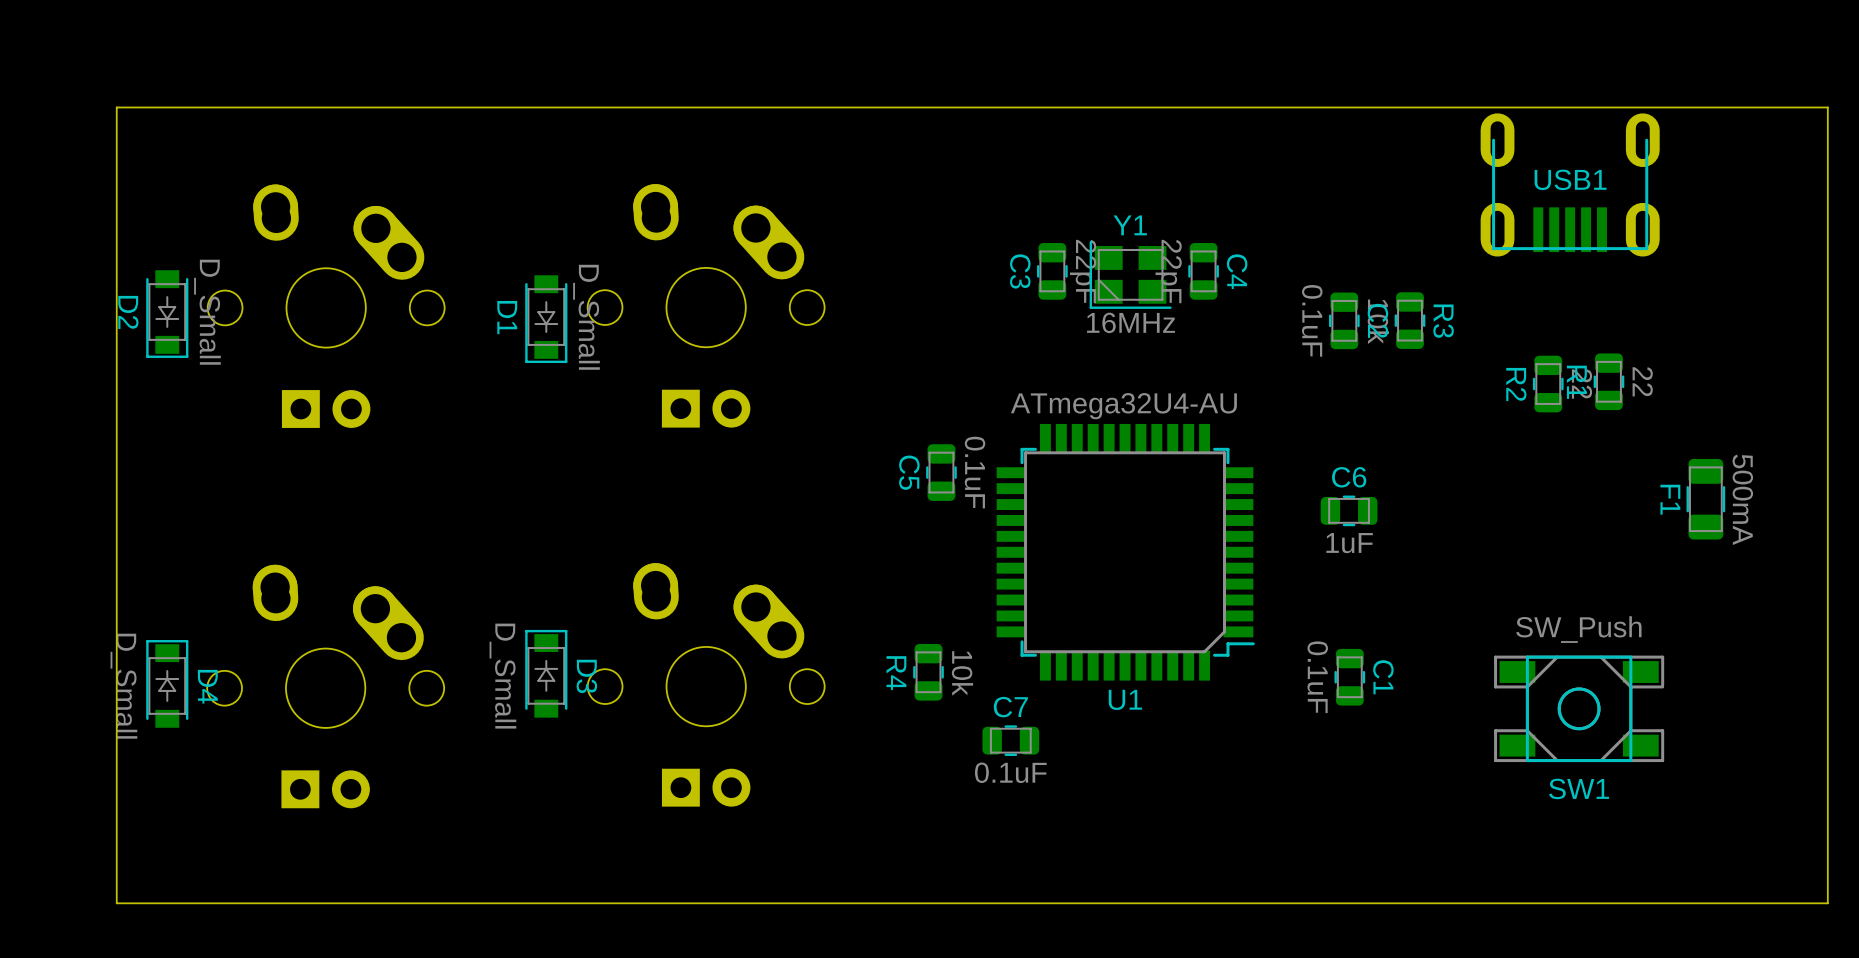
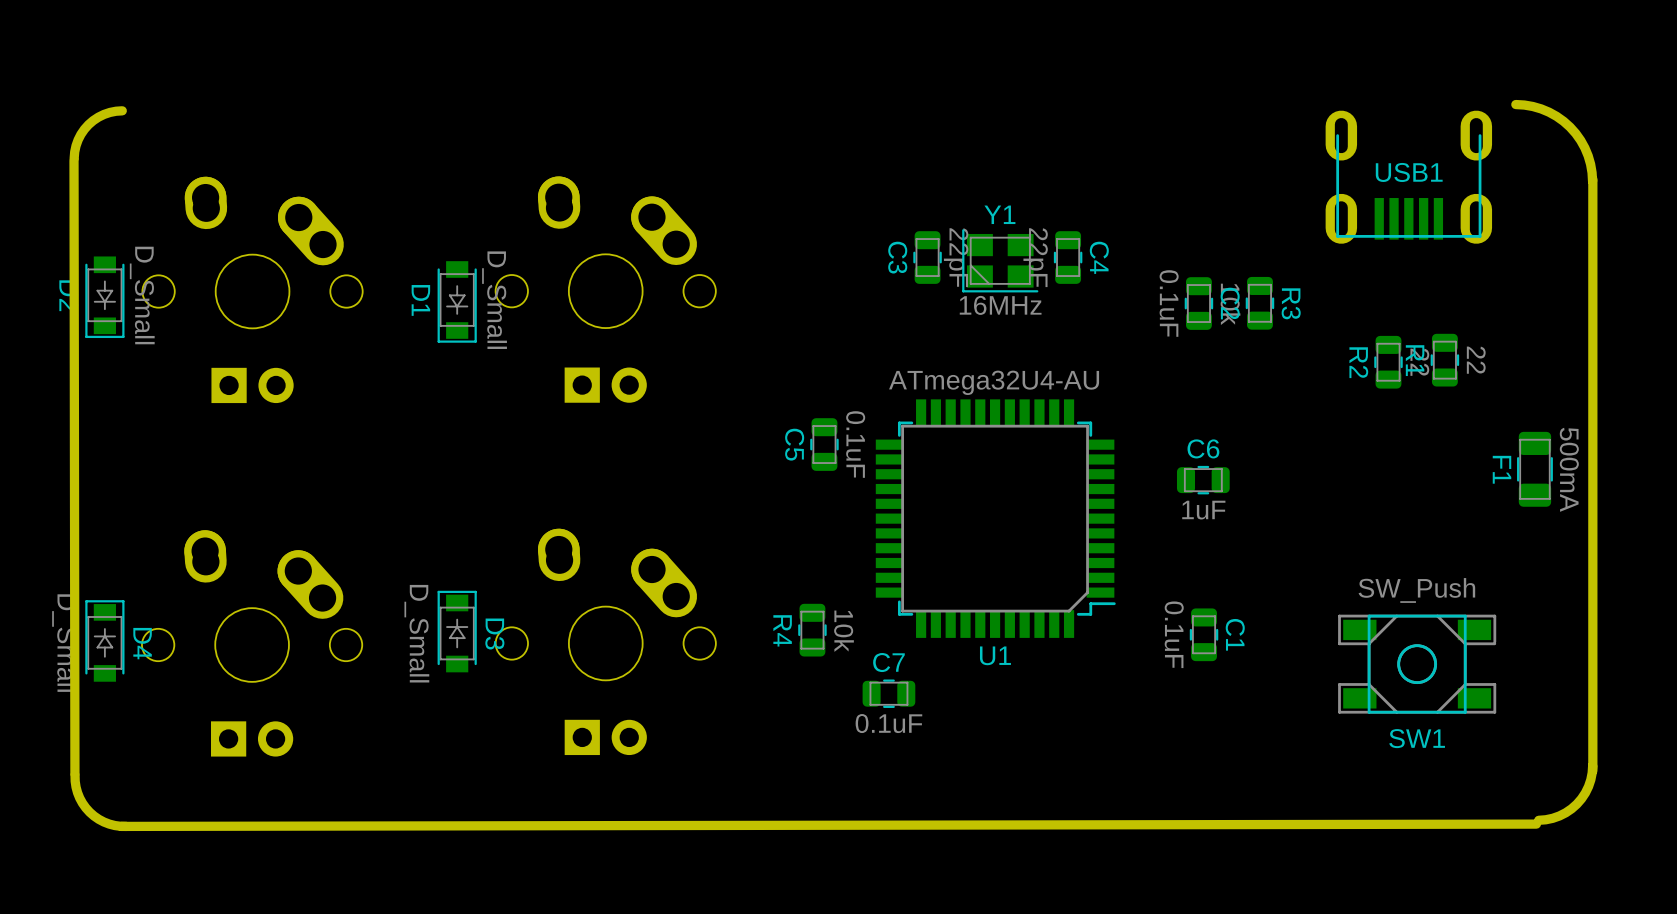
board edge: none -> (1515, 104) (1541, 108) (1556, 116) (1570, 127) (1580, 140) (1588, 155) (1592, 181)
board edge: (1827, 107) (1827, 903) (116, 903) (116, 107) (1827, 107) -> none
board edge: none -> (122, 110) (104, 114) (88, 124) (78, 139) (74, 158)
board edge: none -> (74, 160) (74, 773)
board edge: none -> (1592, 179) (1592, 770)
board edge: none -> (1592, 765) (1588, 786) (1576, 804) (1559, 815) (1538, 820)
board edge: none -> (75, 775) (77, 792) (89, 812) (103, 822) (126, 826)
board edge: none -> (1536, 824) (121, 826)

